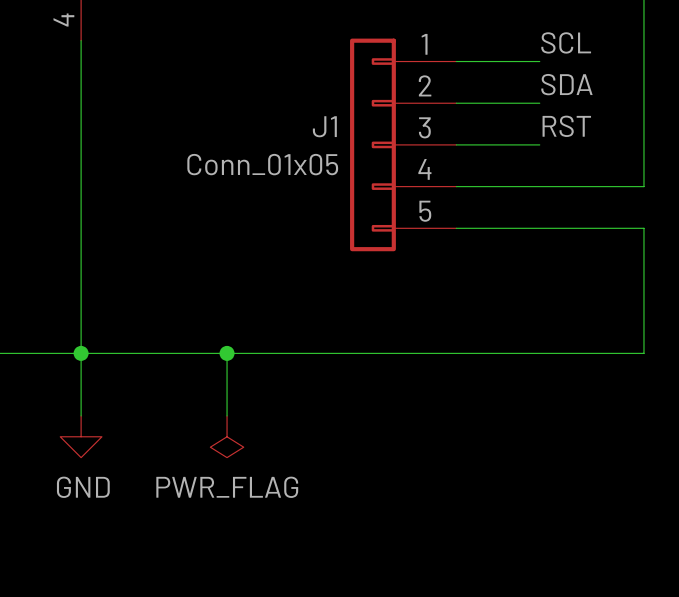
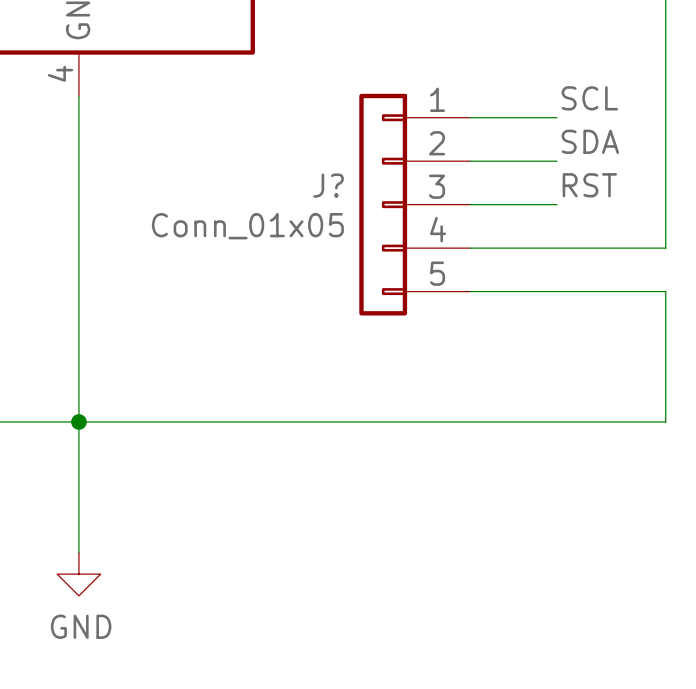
J1 name: J1 (324, 126) -> J? (328, 185)
wire: (227, 353) (227, 415) -> (78, 487) (78, 552)
junction: (227, 353) -> none
power symbol position: GND (81, 436) -> GND (78, 574)
power symbol: PWR_FLAG (227, 436) -> none

